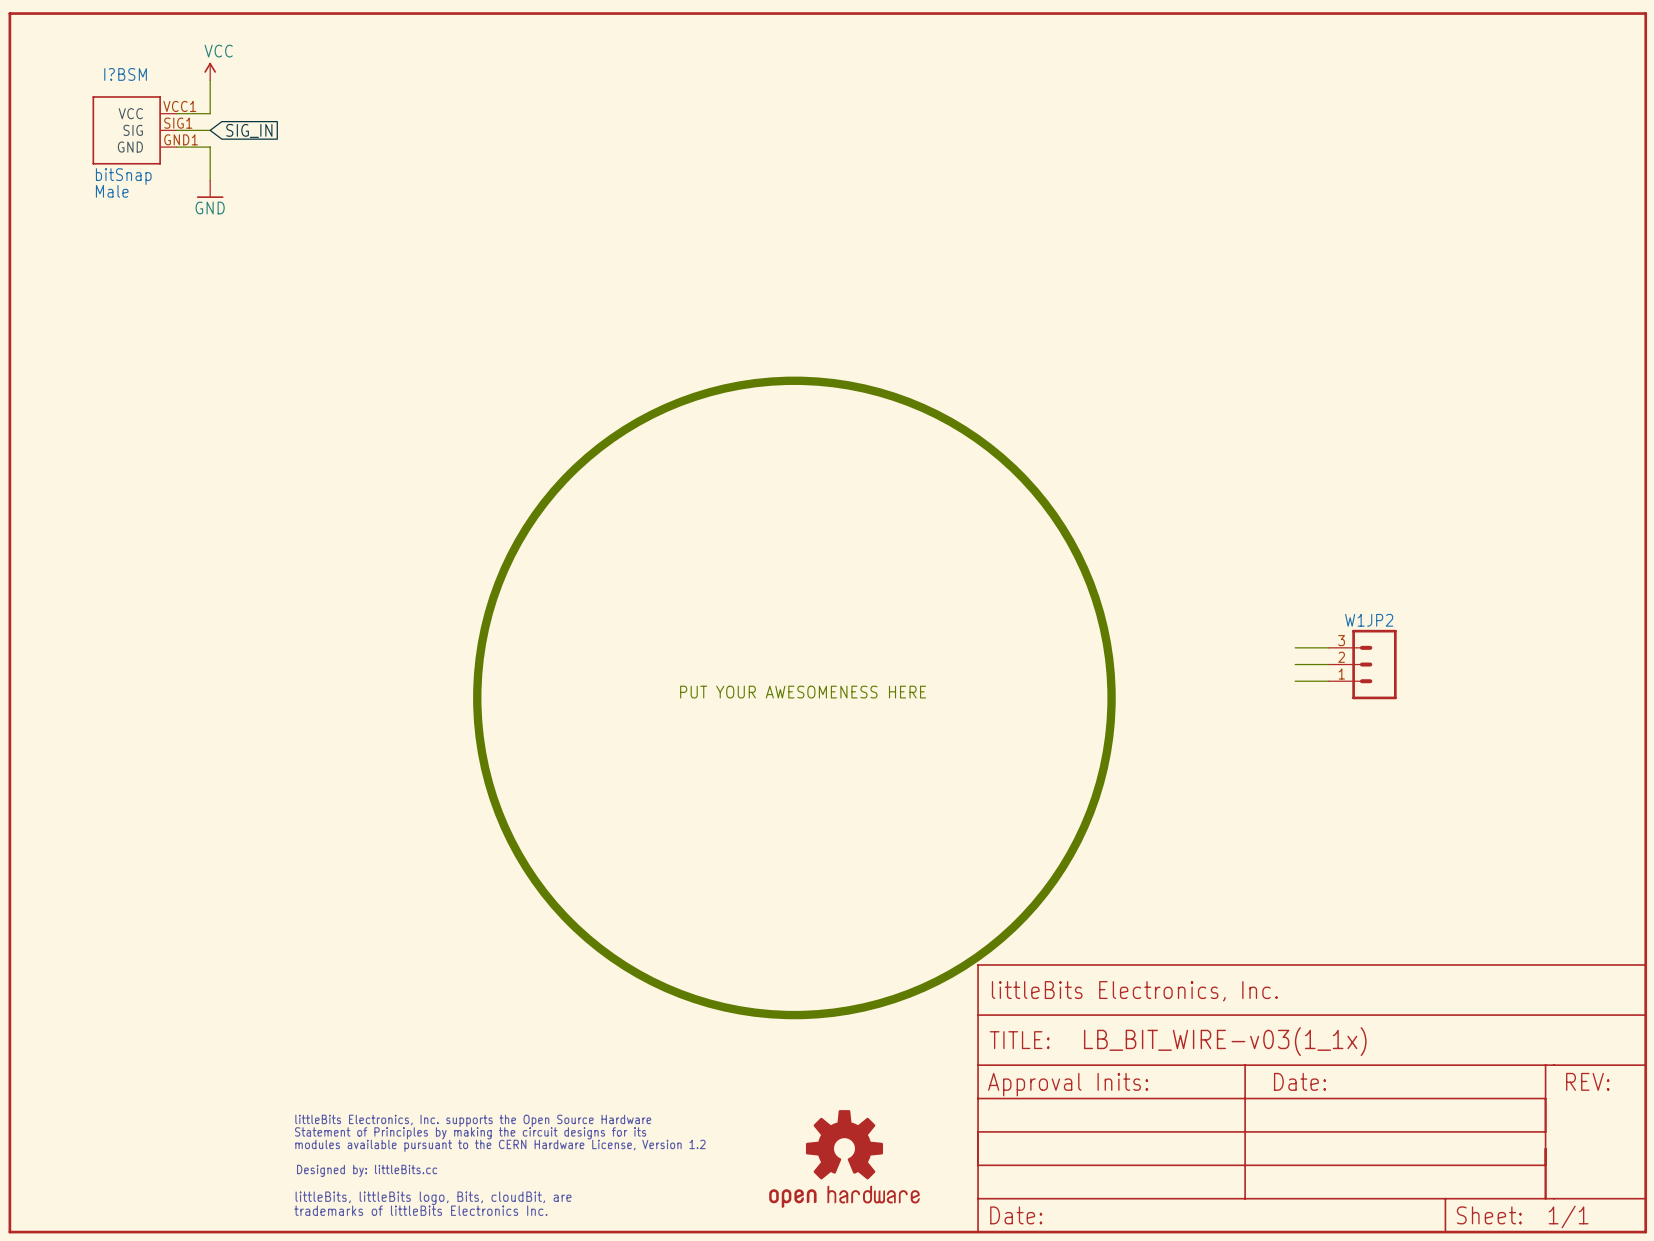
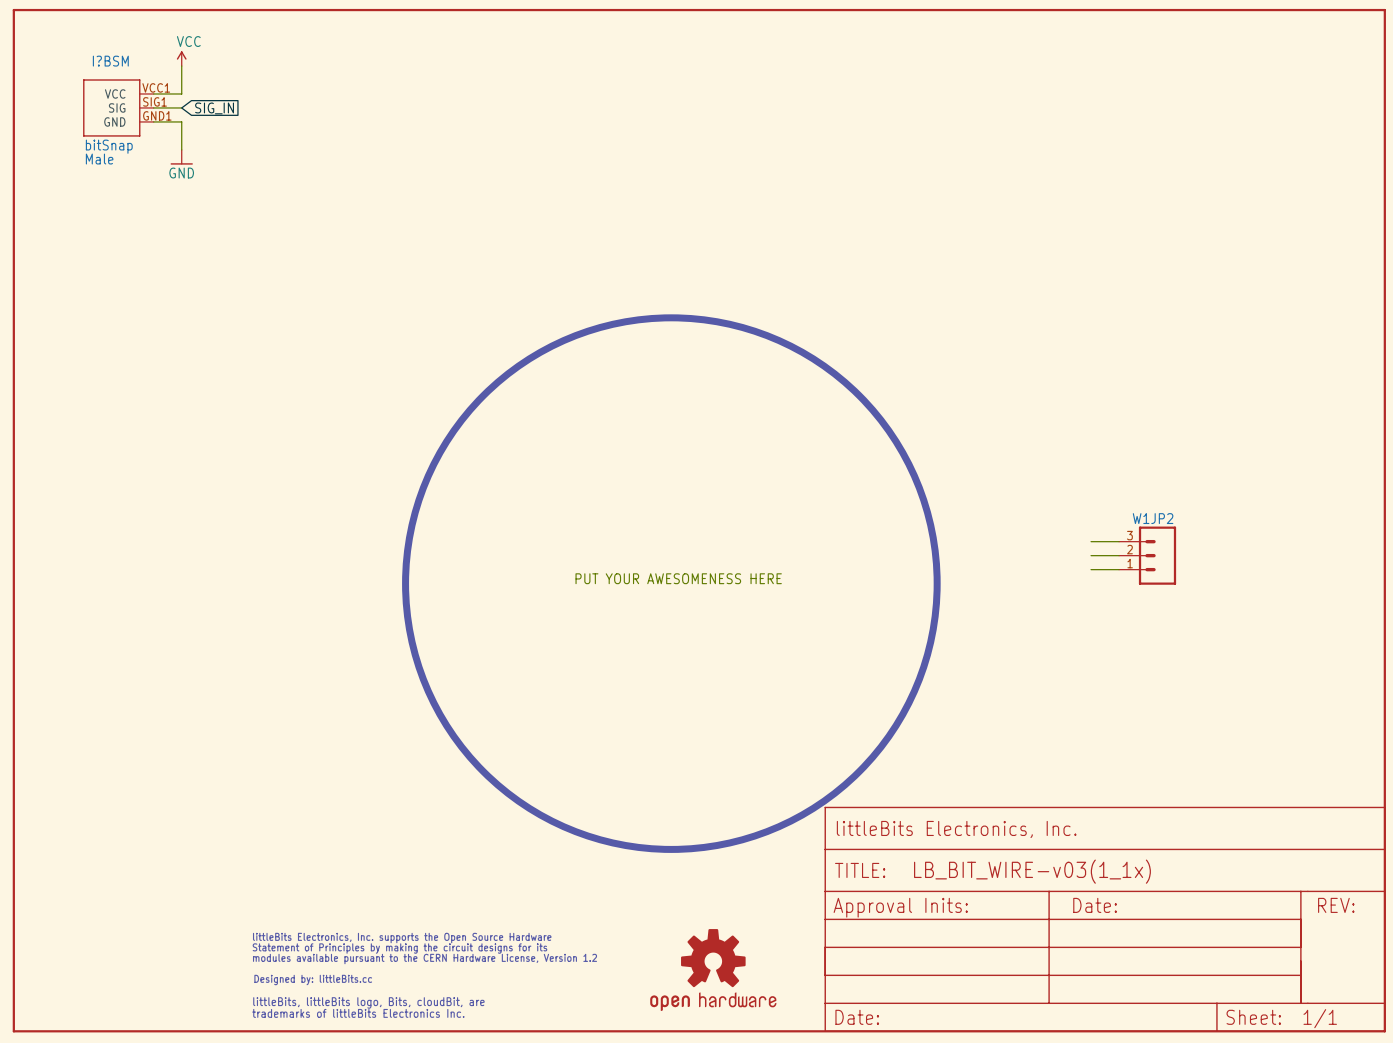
drawing shape: [473, 376, 1116, 1020] -> [402, 314, 941, 853]

